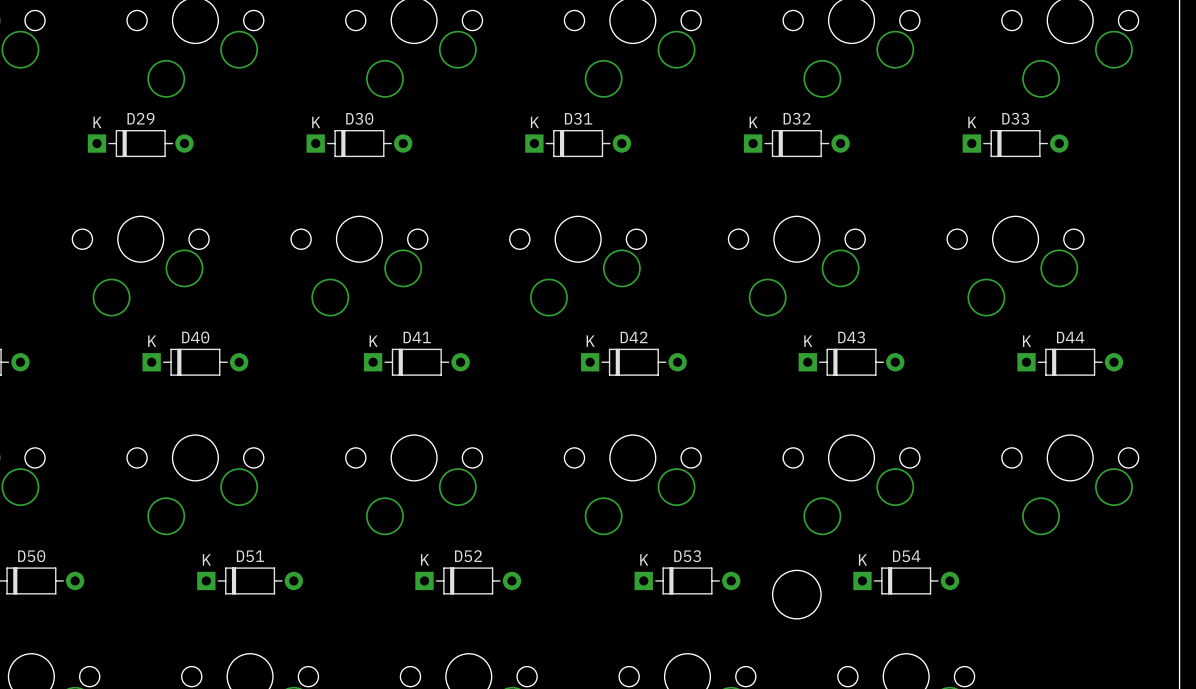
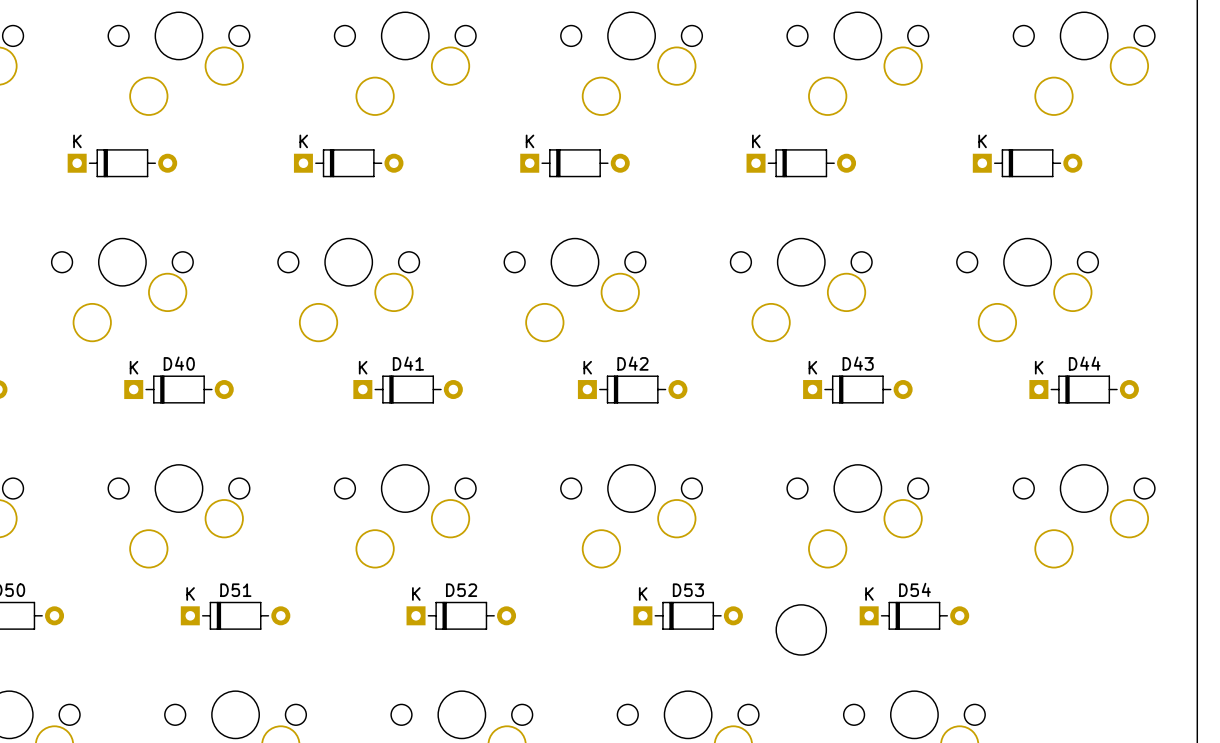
D29 name: D29 (140, 118) -> none
D30 name: D30 (359, 118) -> none
D31 name: D31 (578, 118) -> none
D32 name: D32 (797, 118) -> none
D33 name: D33 (1015, 118) -> none

